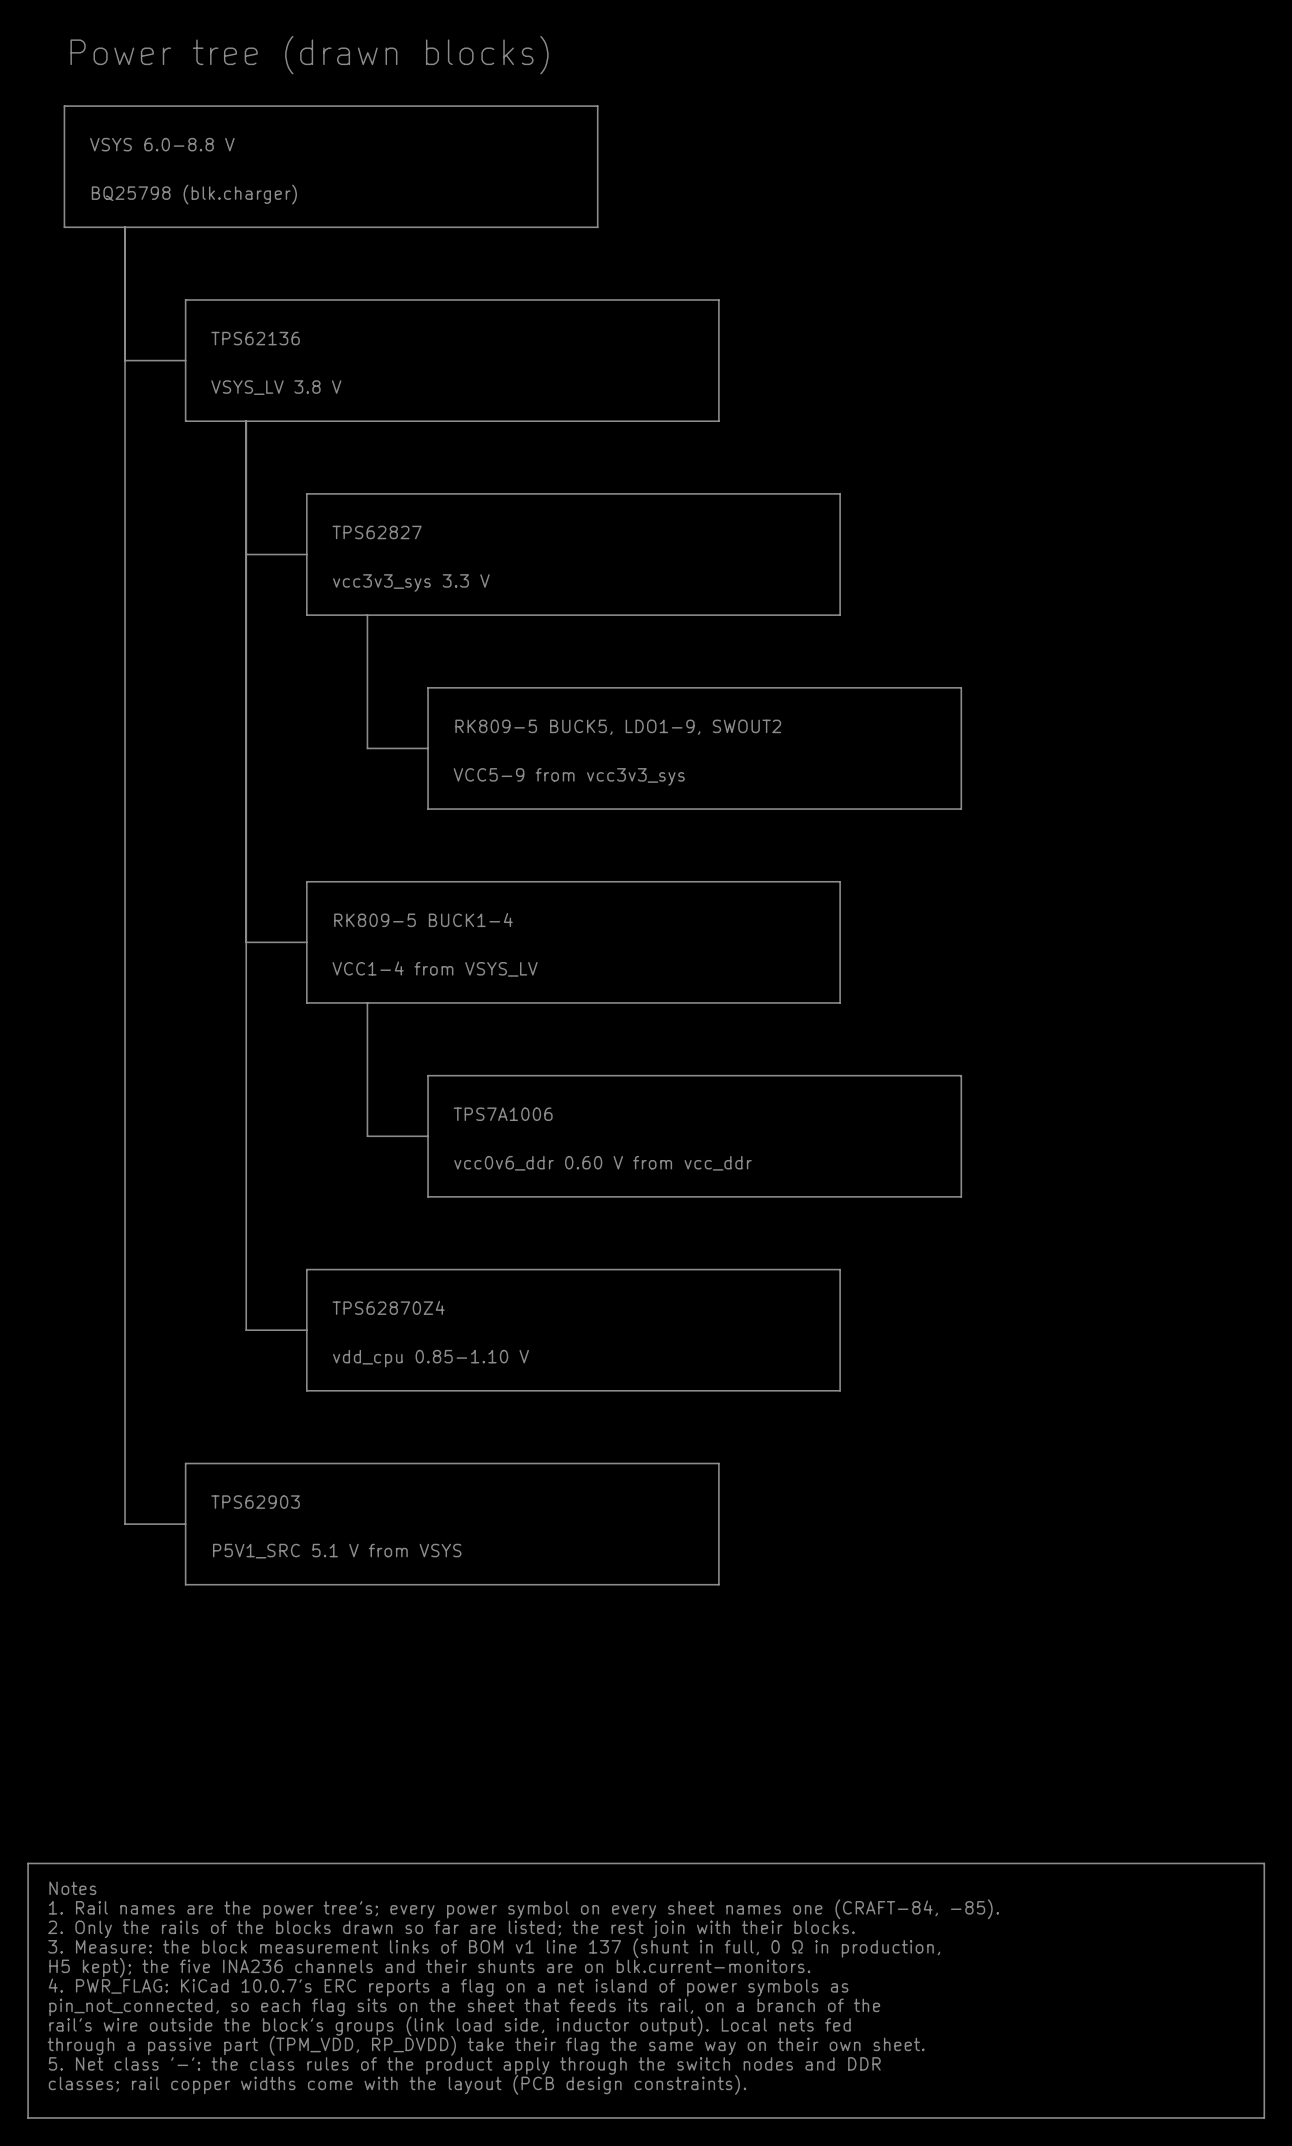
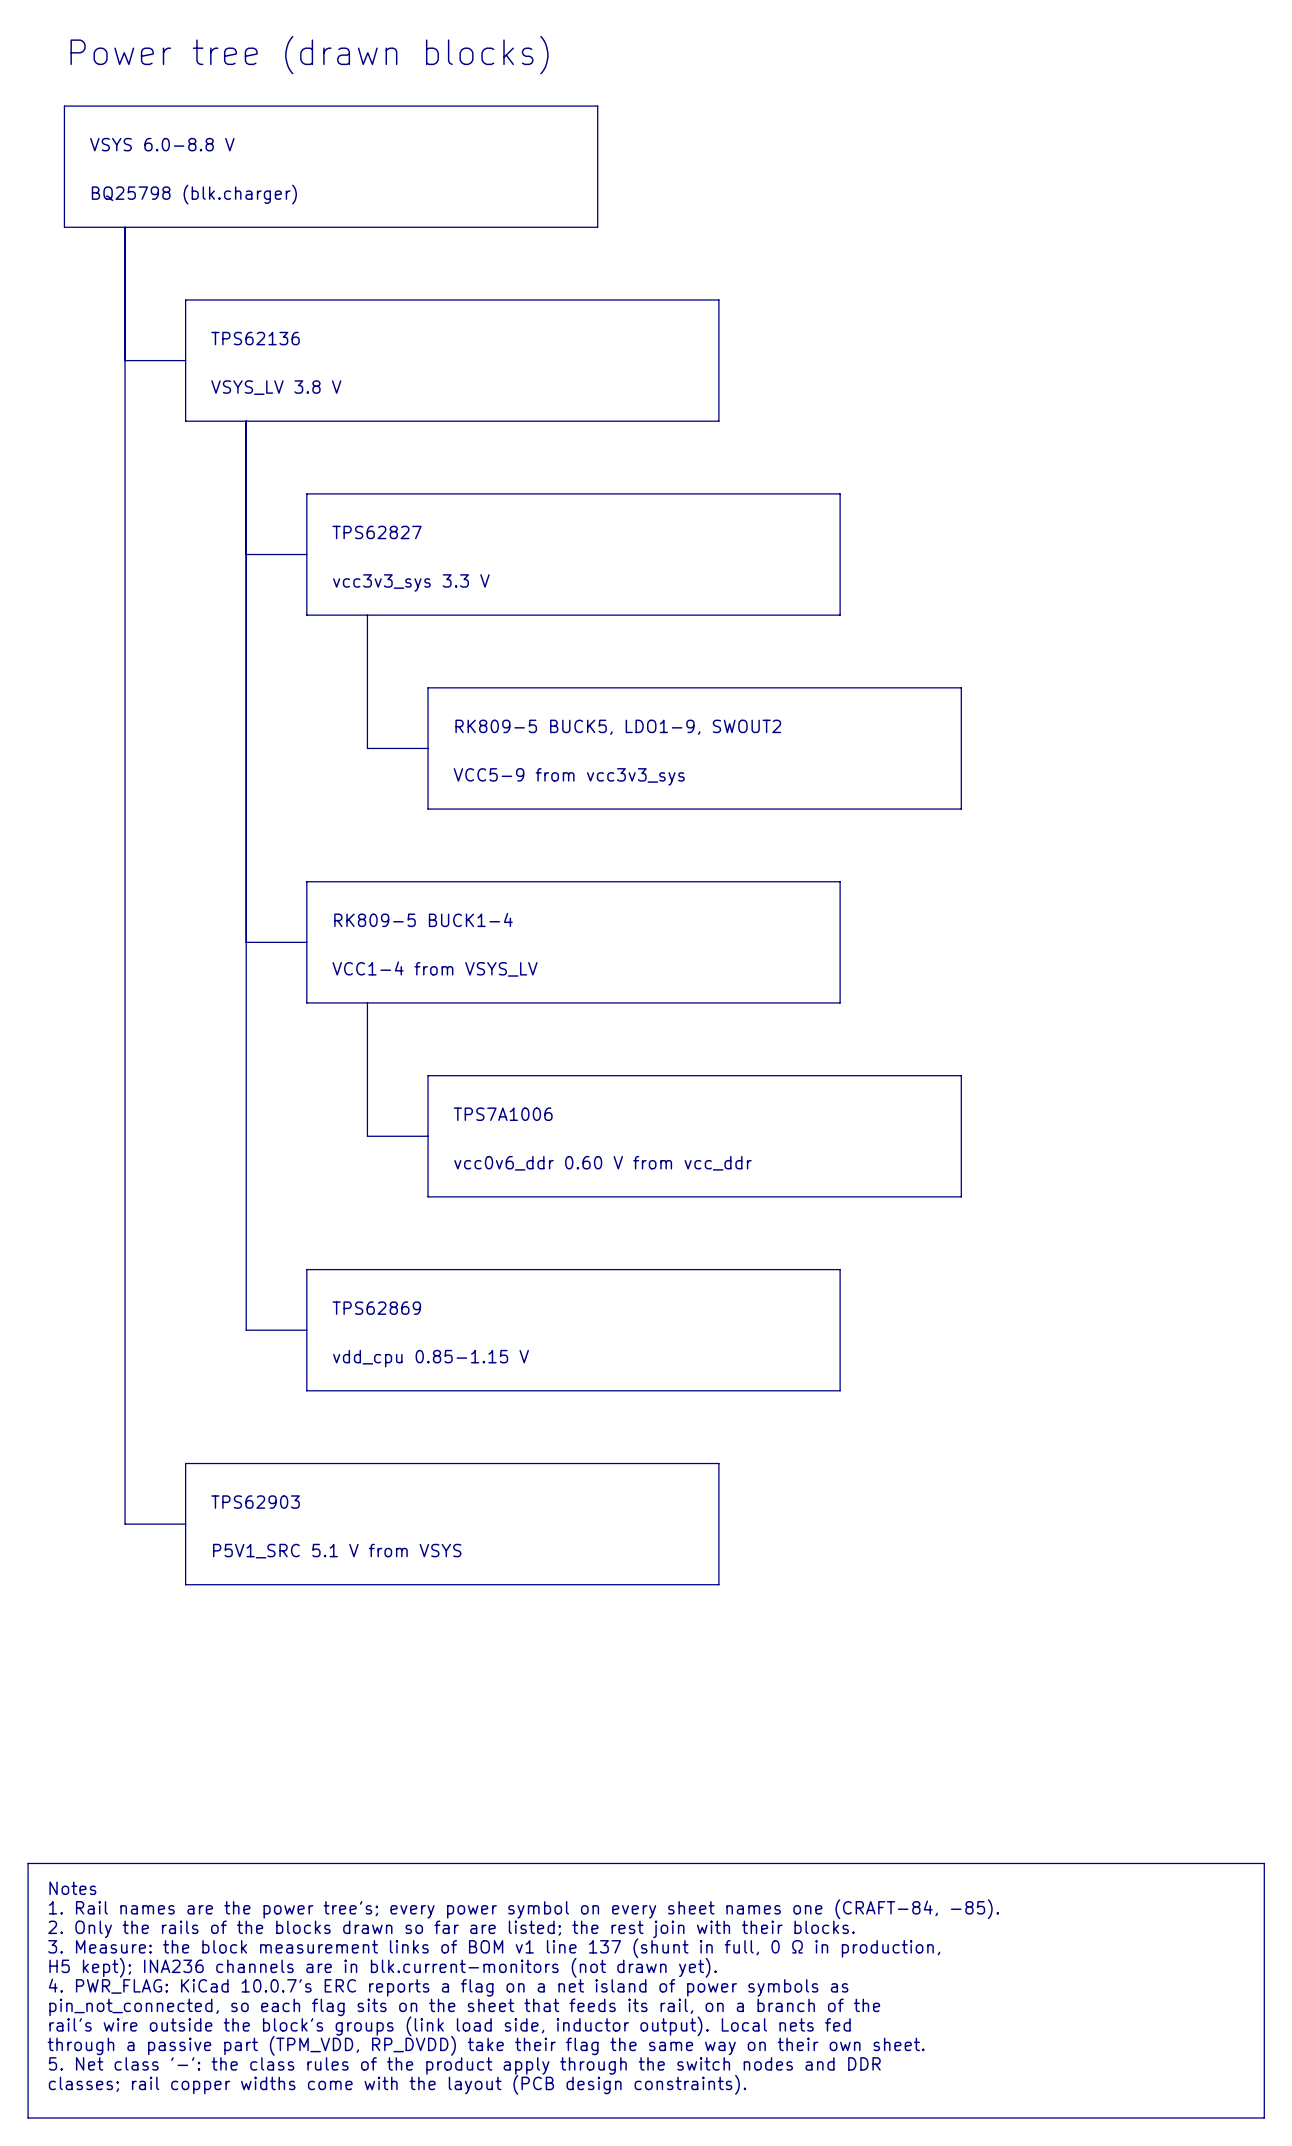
text: TPS62870Z4 (388, 1307) -> TPS62869 (376, 1308)
text: vdd_cpu 0.85-1.10 V (431, 1358) -> vdd_cpu 0.85-1.15 V (431, 1358)
text: H5 kept); the five INA236 channels and their shunts are on blk.current-monitors. (429, 1967) -> H5 kept); INA236 channels are in blk.current-monitors (not drawn yet). (383, 1967)

